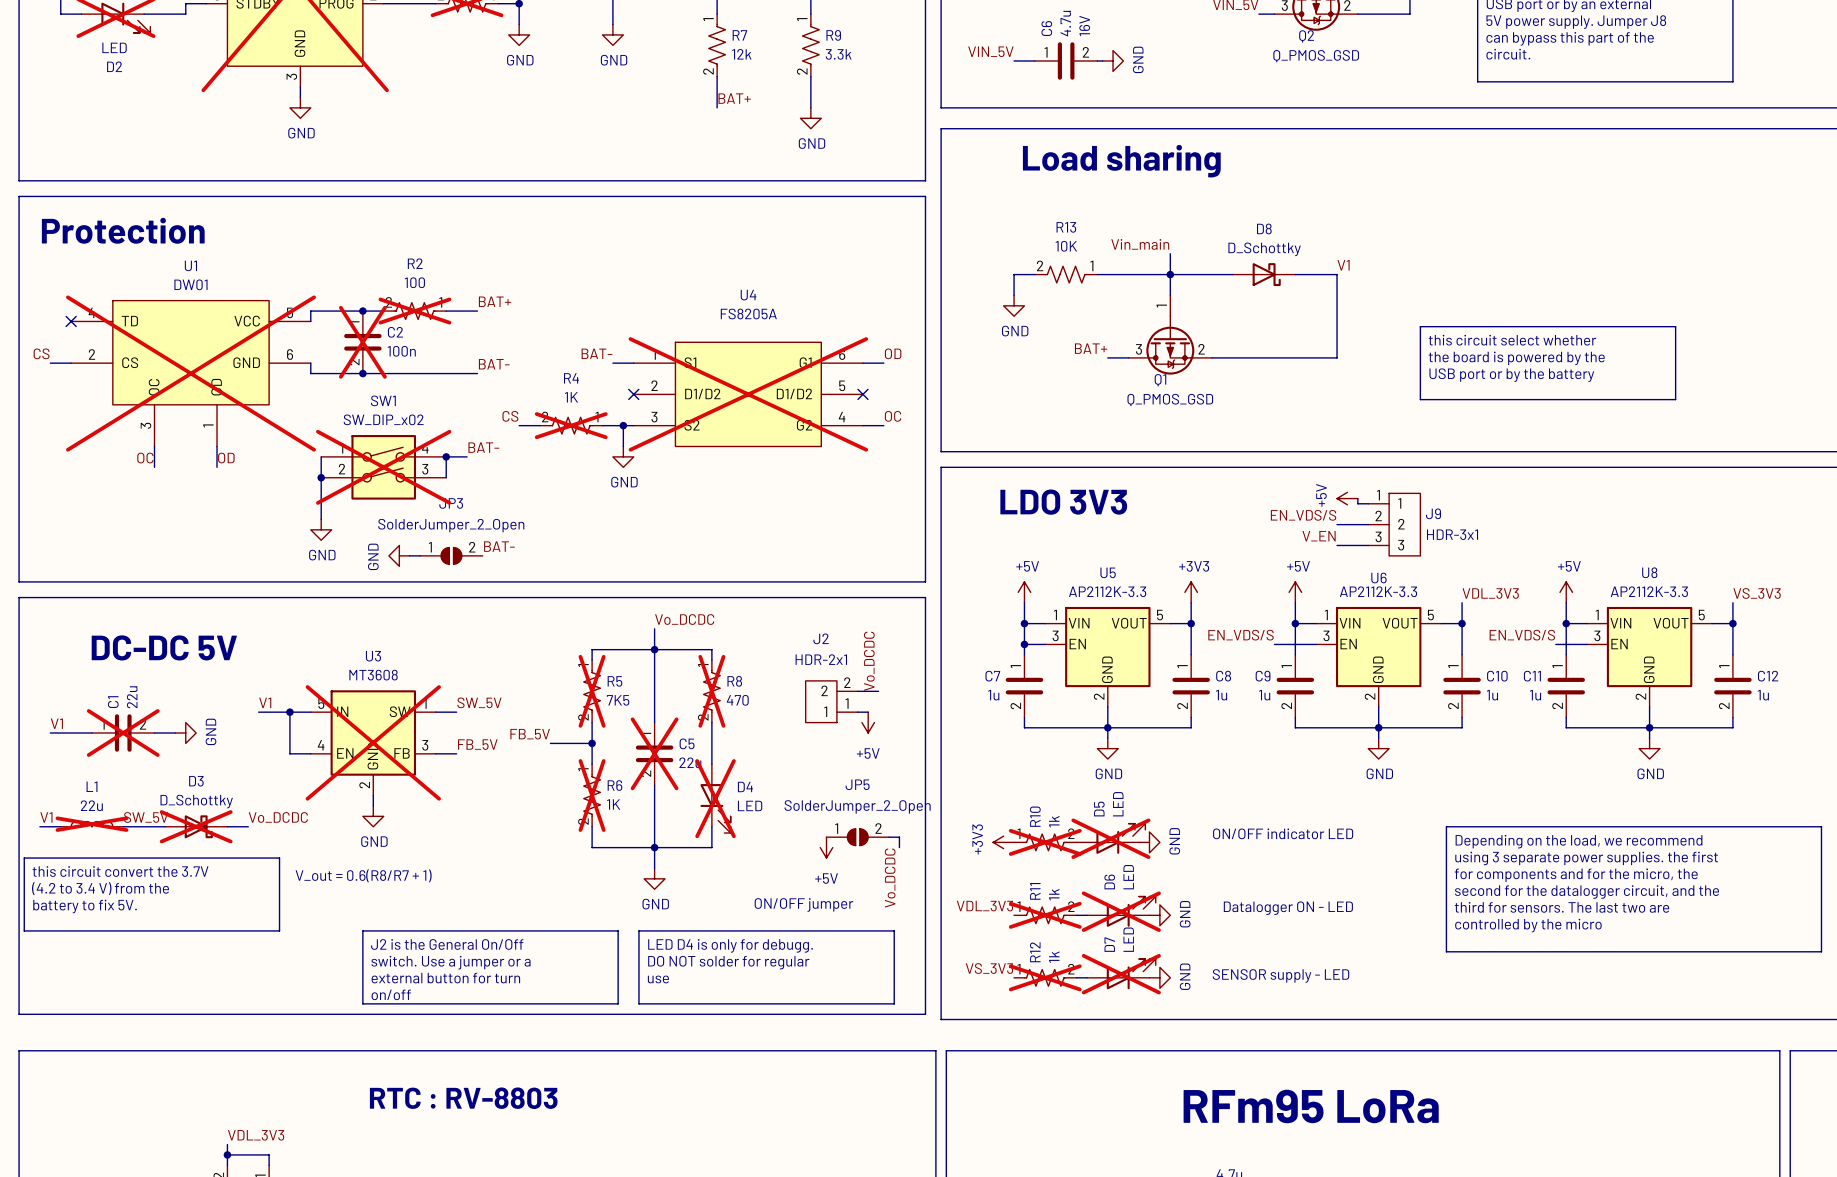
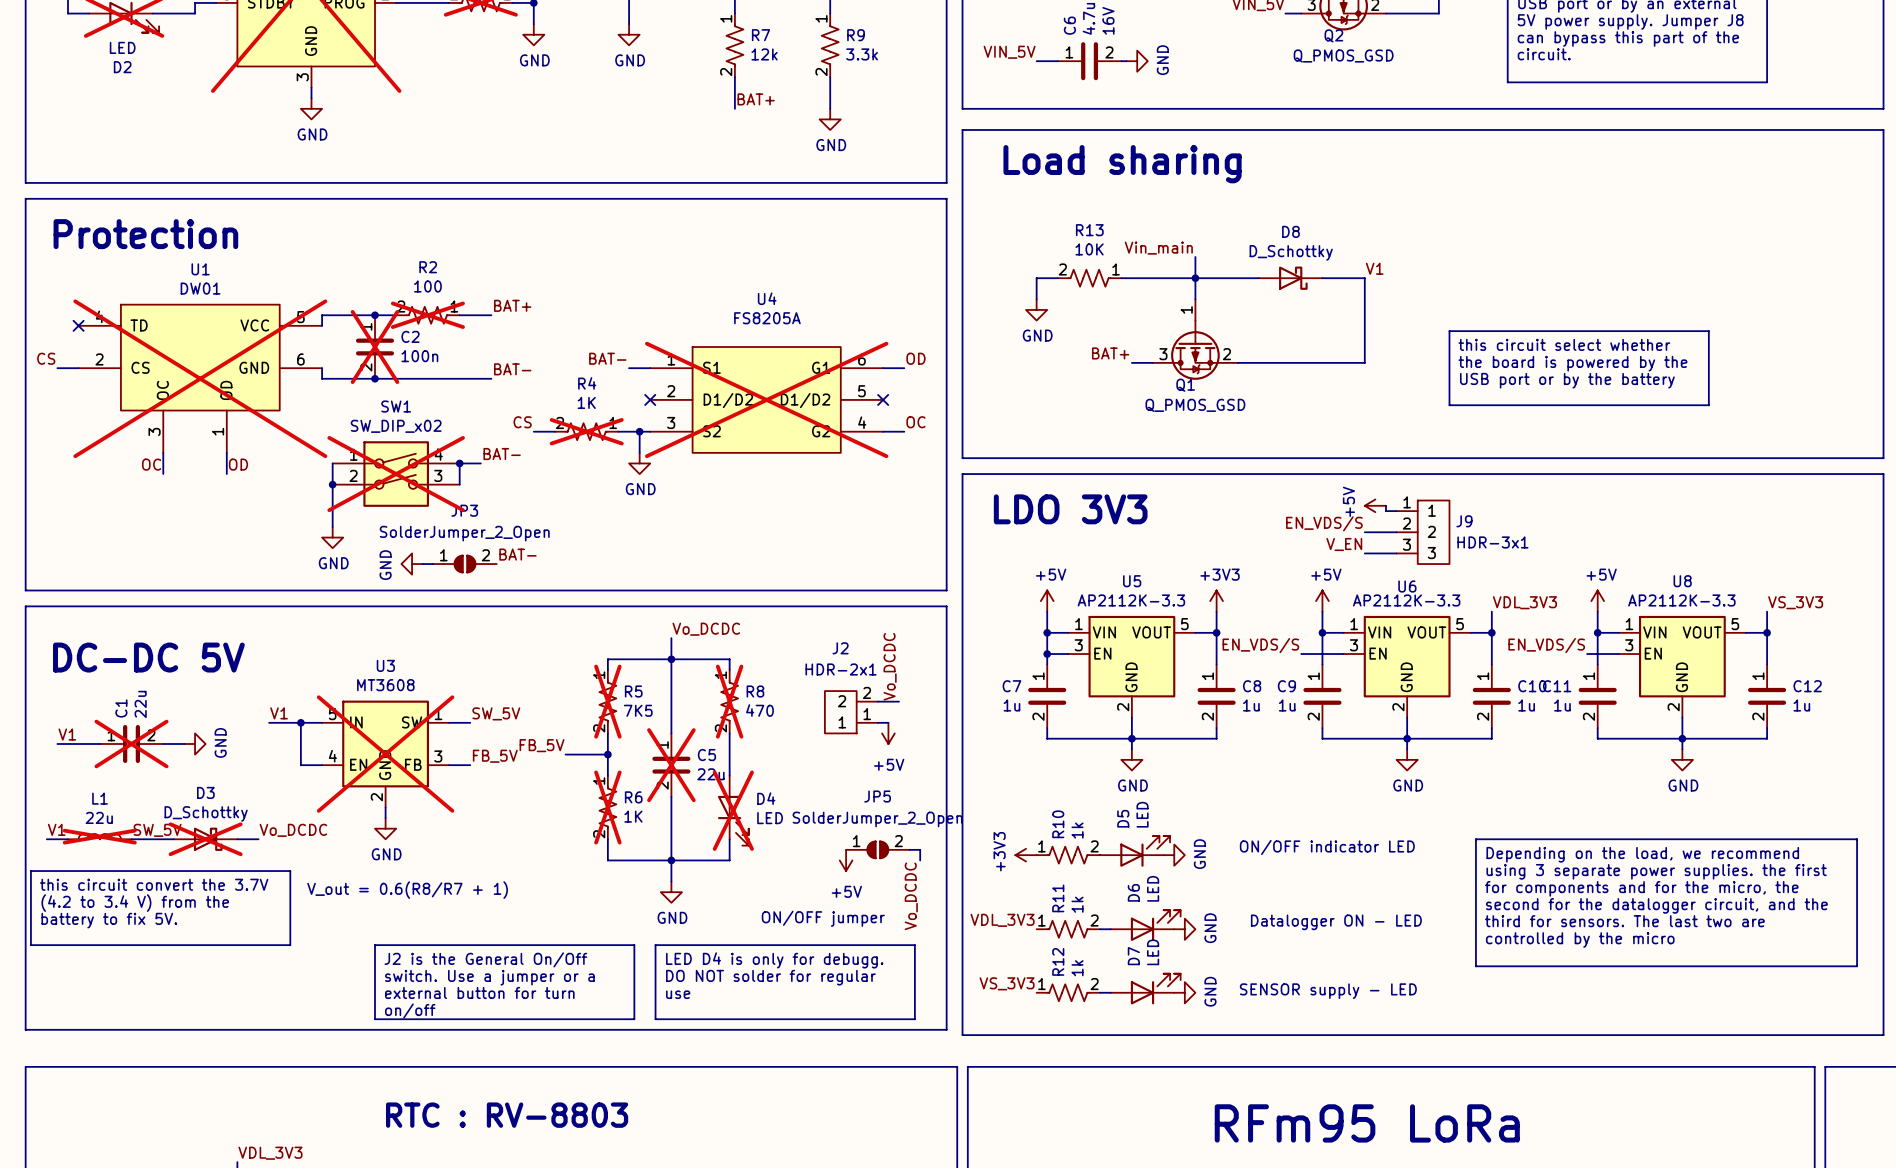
D5 do-not-place cross: (1110, 838) -> none
R10 do-not-place cross: (1045, 842) -> none
D6 do-not-place cross: (1121, 911) -> none
R11 do-not-place cross: (1045, 915) -> none
D7 do-not-place cross: (1121, 974) -> none
R12 do-not-place cross: (1045, 977) -> none

